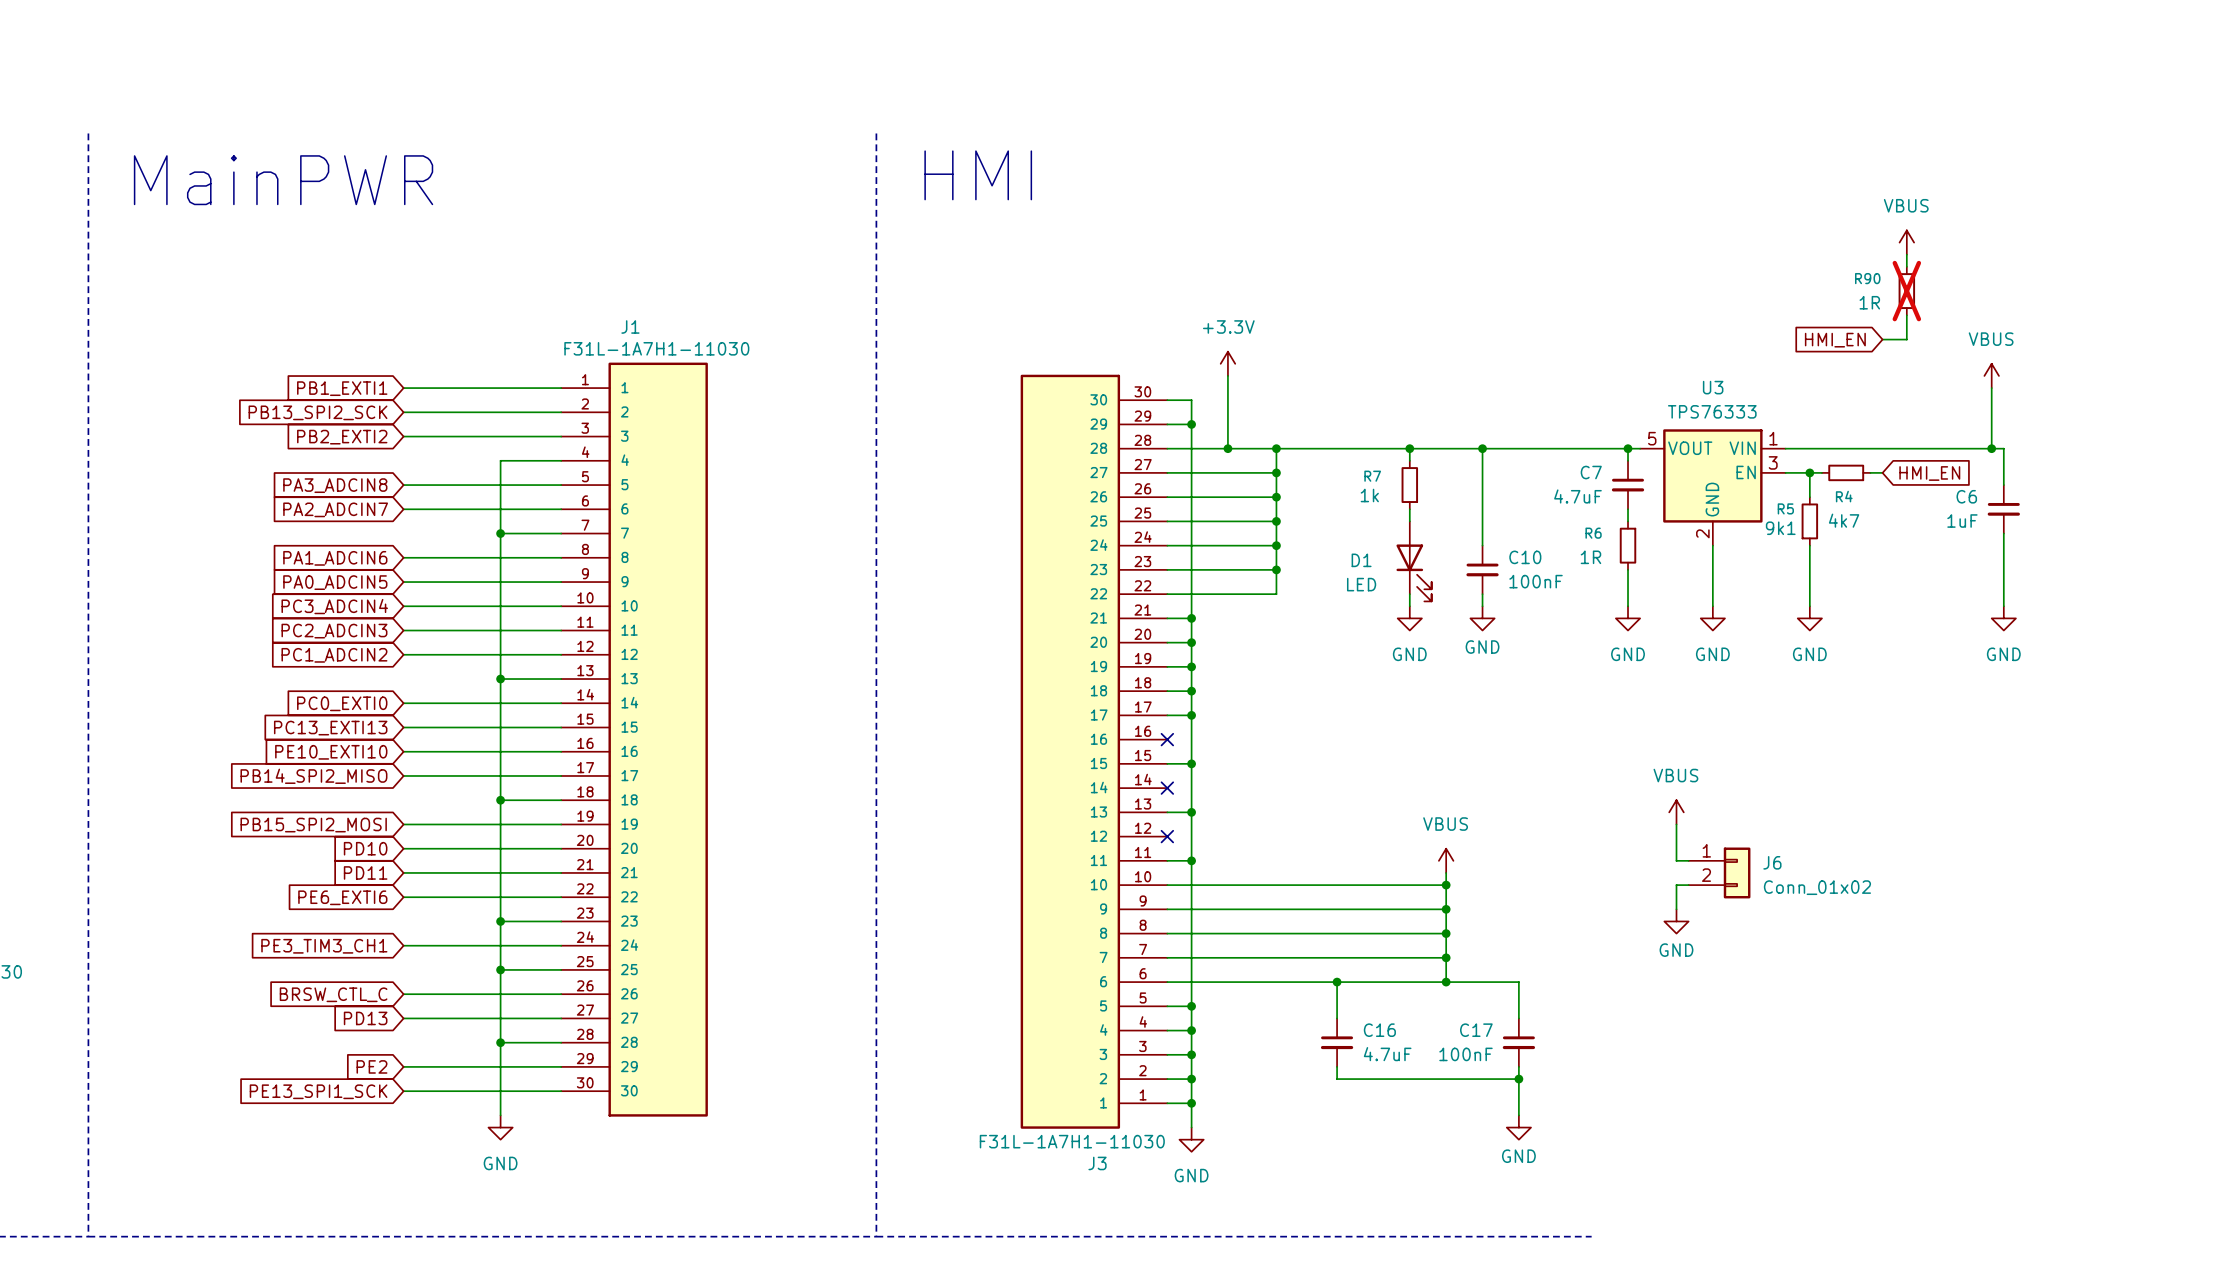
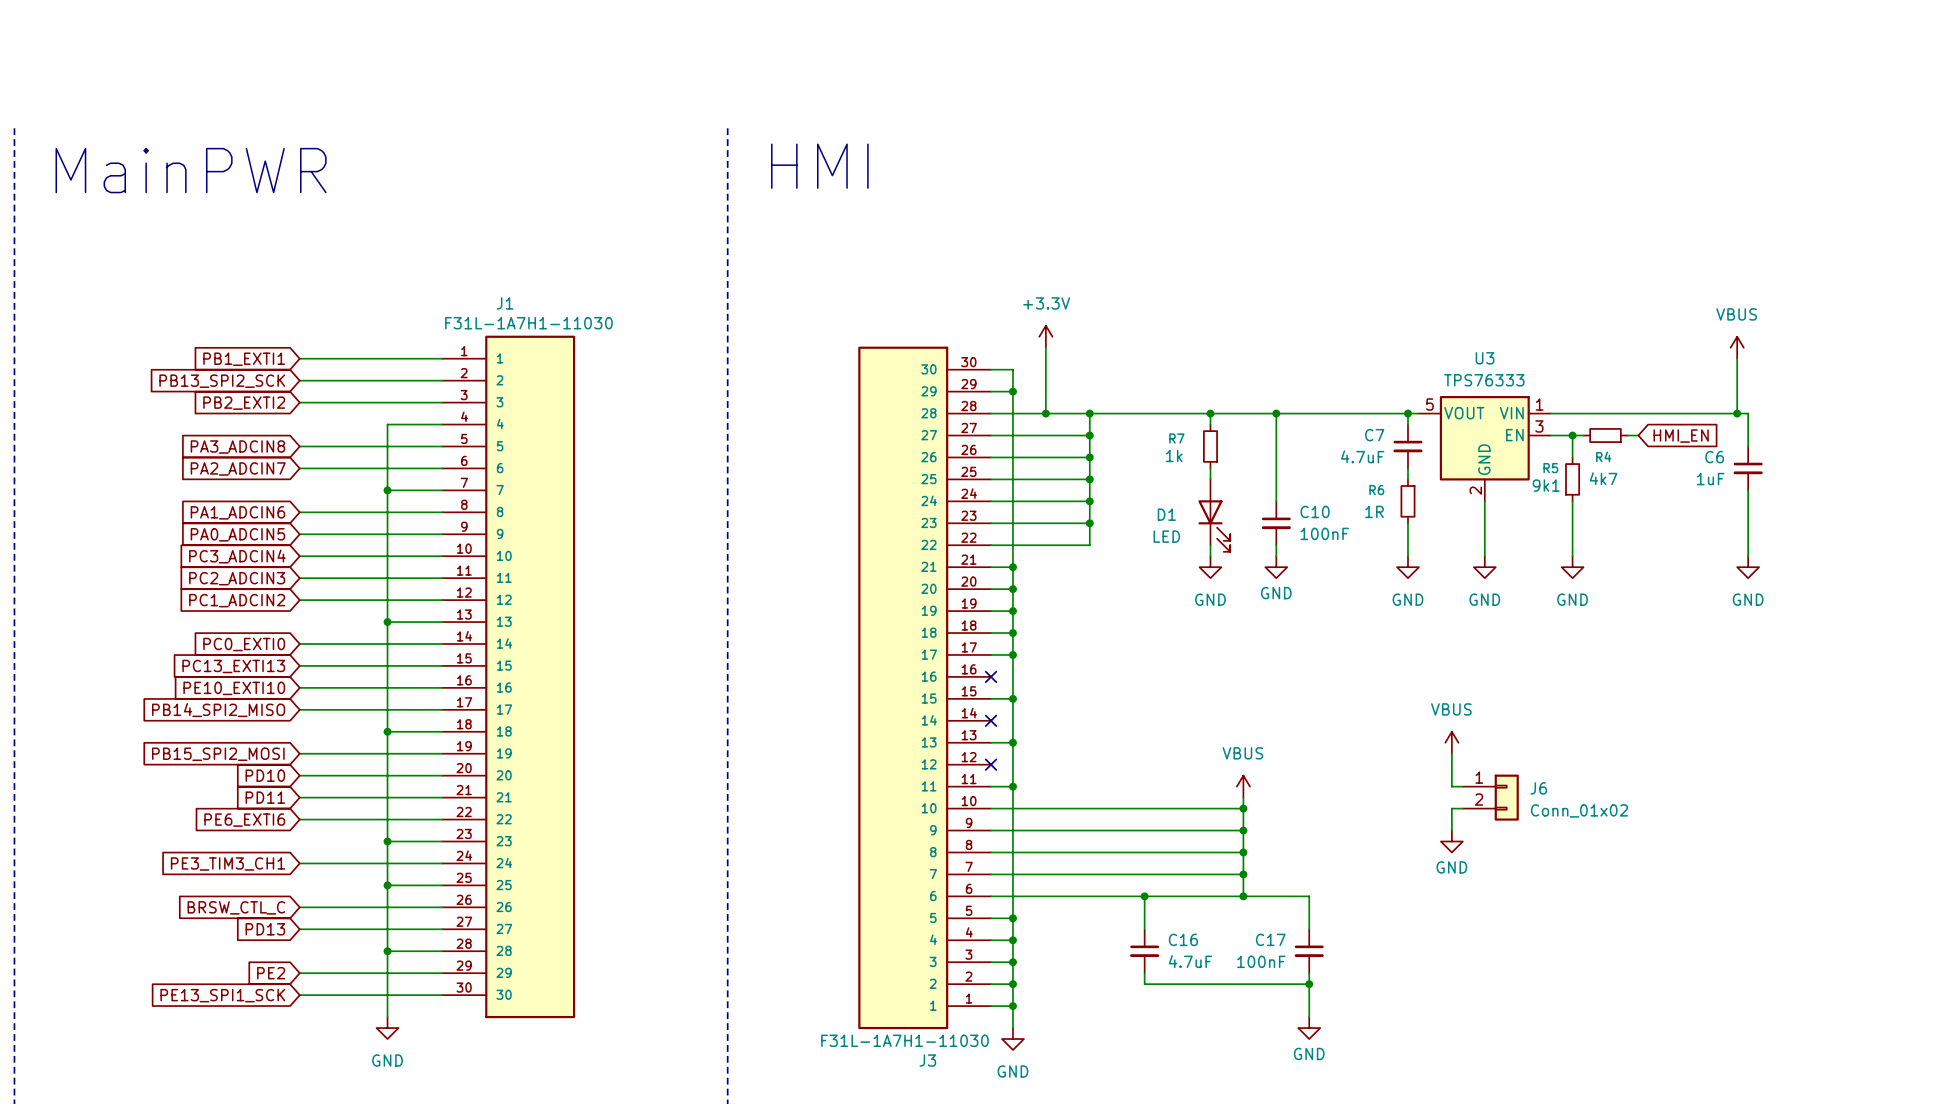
power symbol: VBUS (1906, 242) -> none
wire: (1906, 254) (1906, 266) -> none
R90: 1R (1906, 291) -> none
wire: (1906, 315) (1906, 339) (1882, 339) -> none
global label: HMI_EN (1835, 340) -> none

